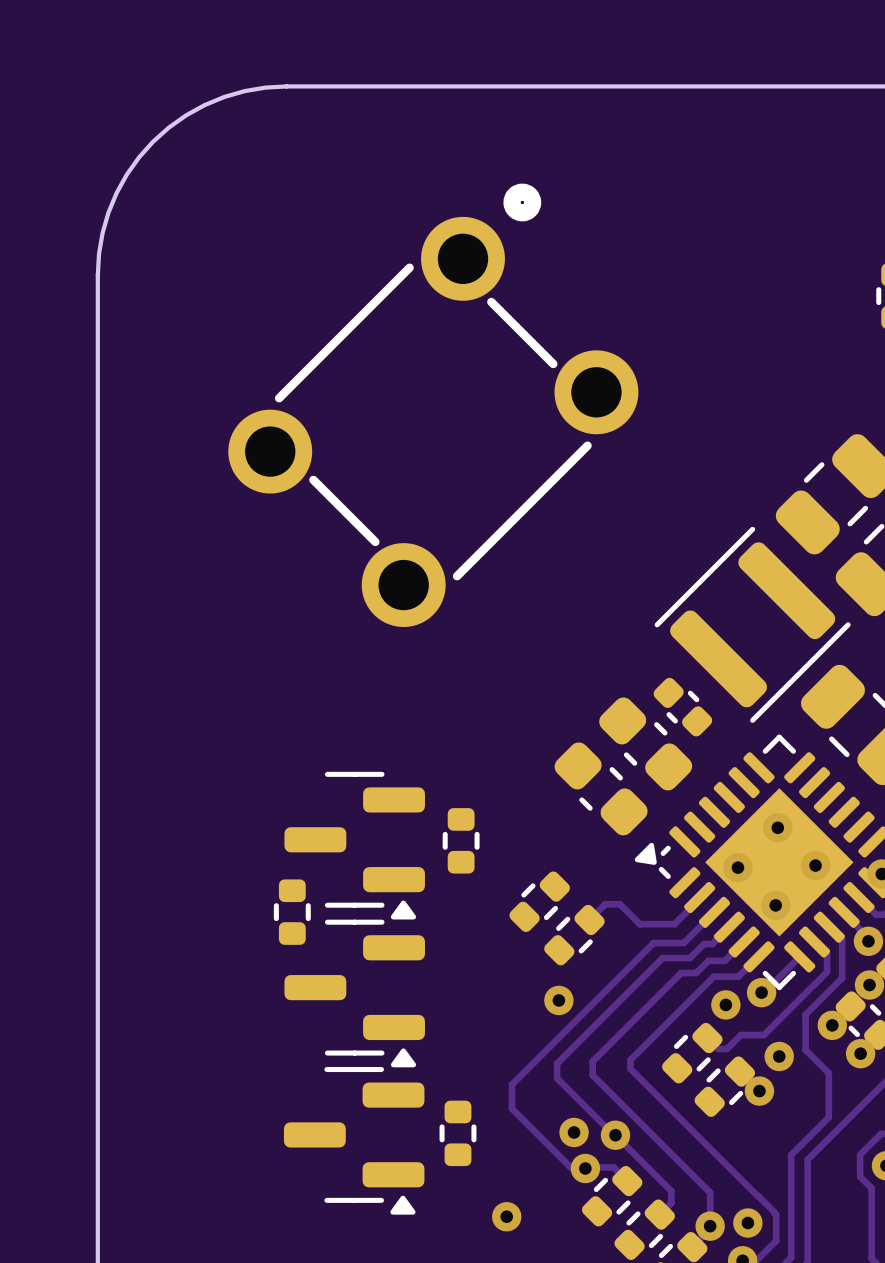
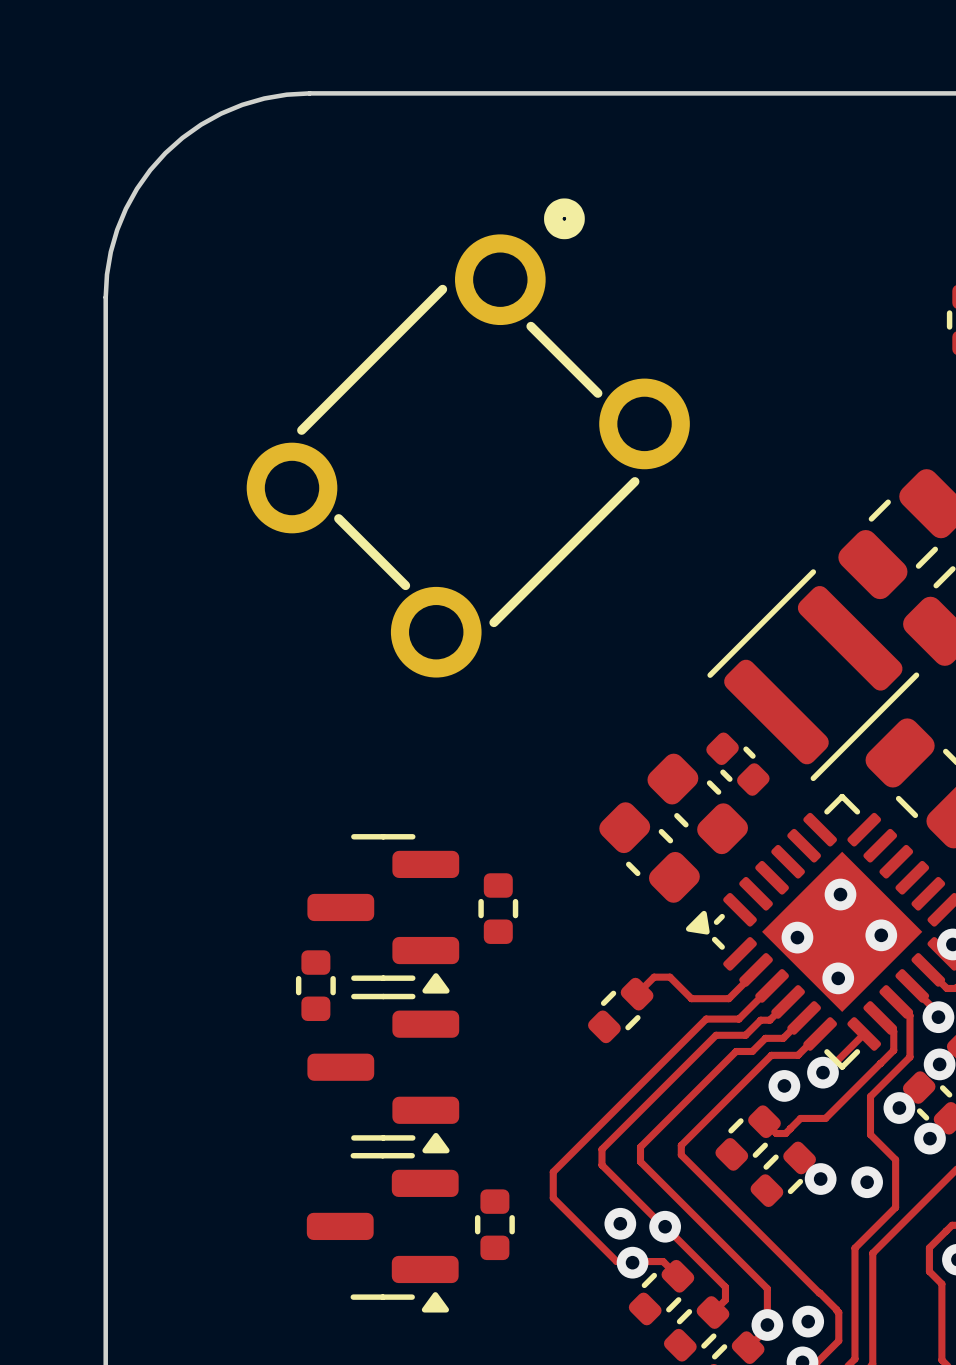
part: (539, 901) -> none
via: (558, 1000) -> none
via position: (779, 1056) -> (867, 1182)
via: (506, 1216) -> none

